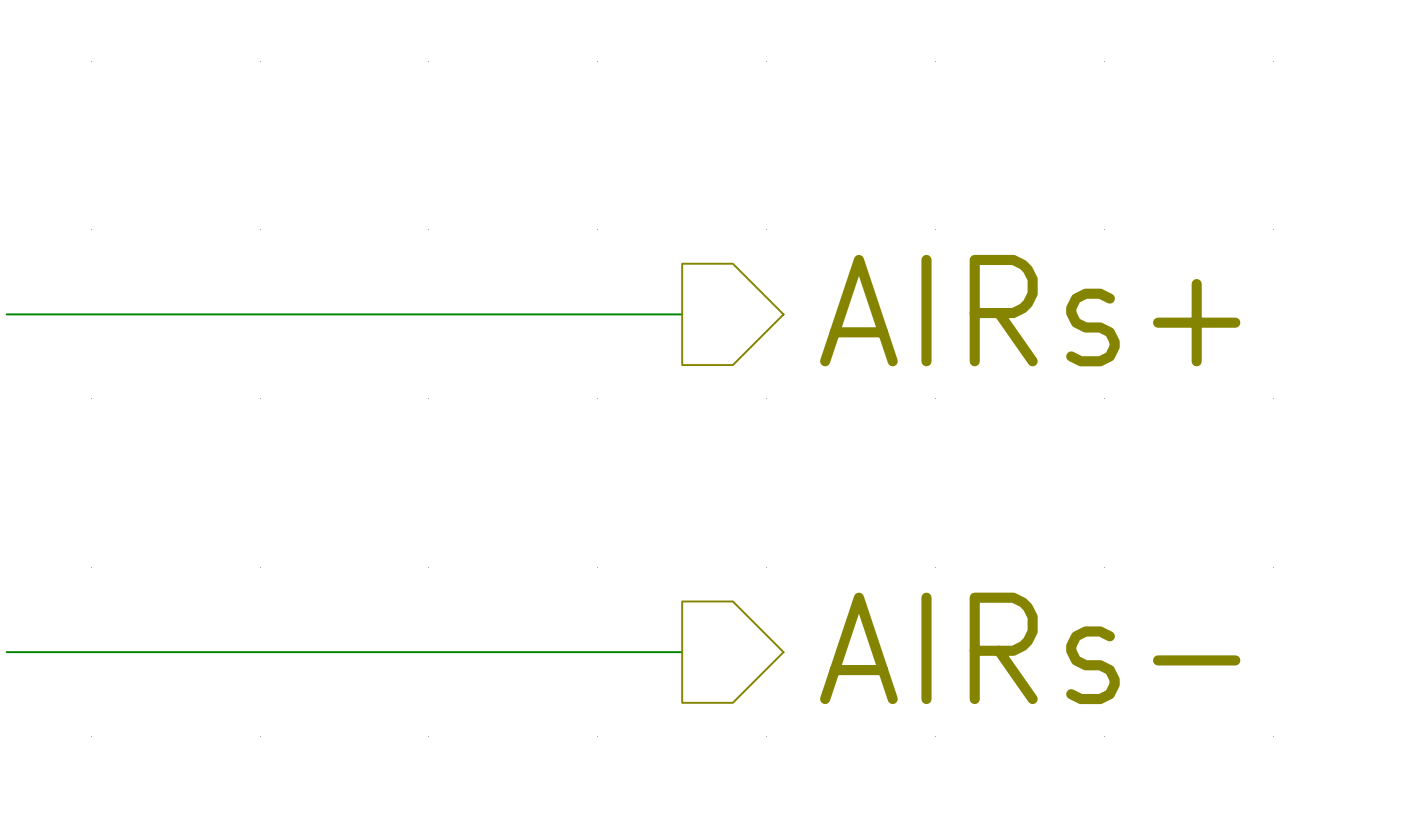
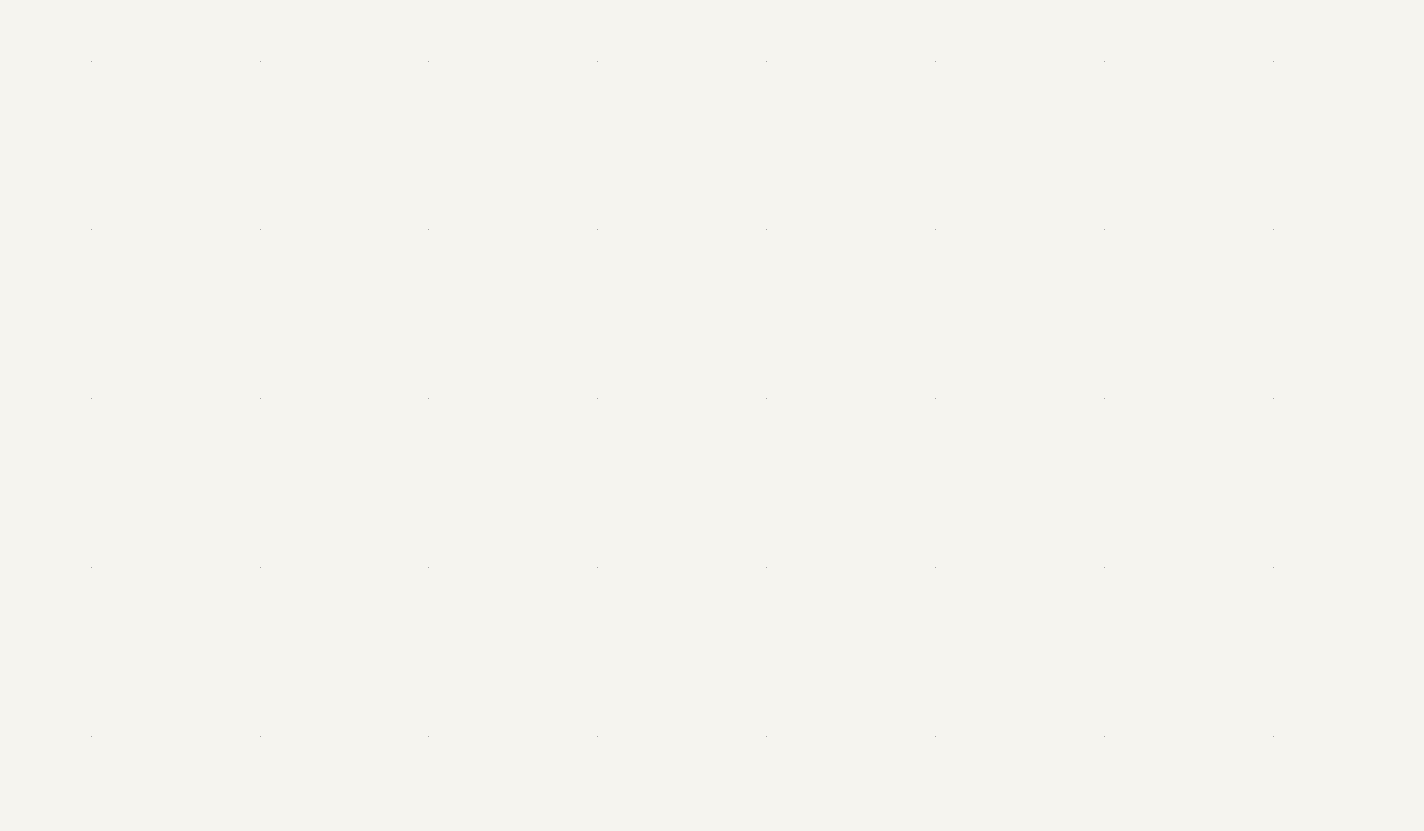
hierarchical label: AIRs+ (1030, 310) -> none
wire: (6, 314) (682, 314) -> none
hierarchical label: AIRs- (1030, 648) -> none
wire: (6, 652) (682, 652) -> none

